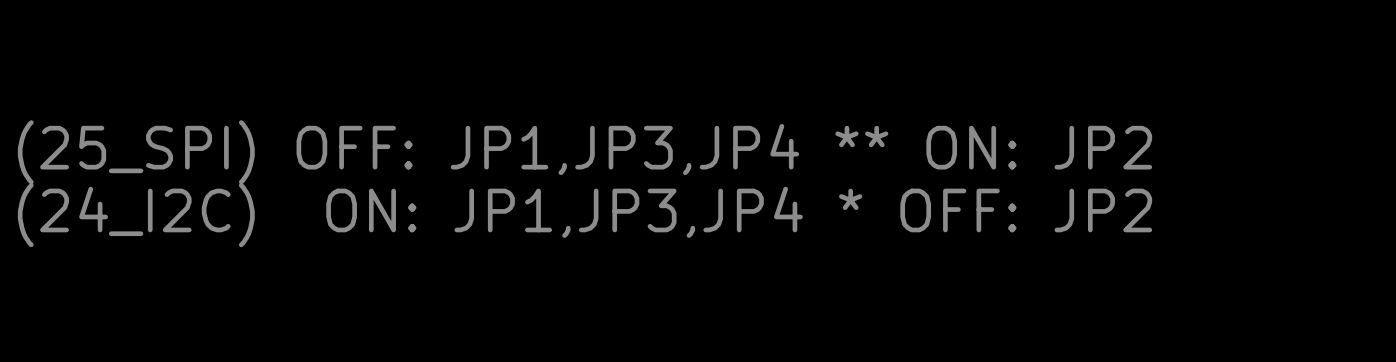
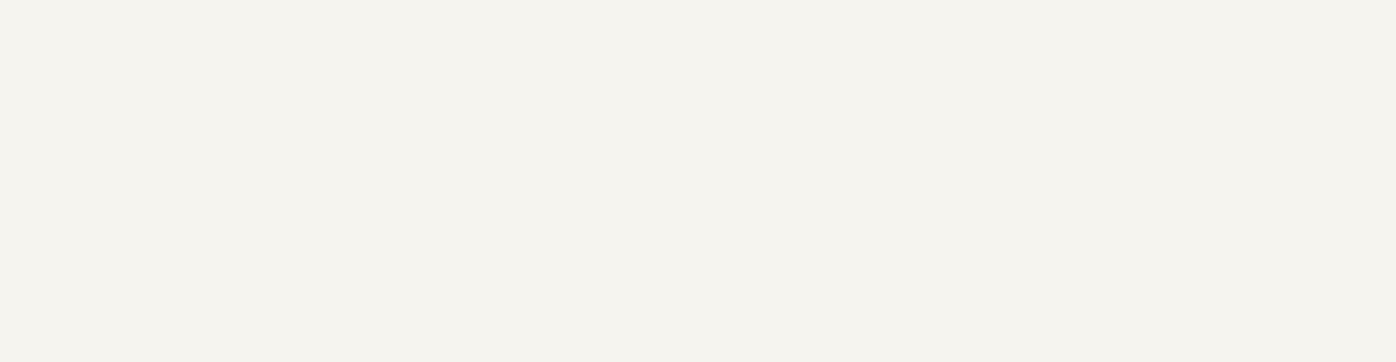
text: (25_SPI) OFF: JP1,JP3,JP4 ** ON: JP2 (584, 152) -> none
text: (24_I2C) ON: JP1,JP3,JP4 * OFF: JP2 (584, 215) -> none

